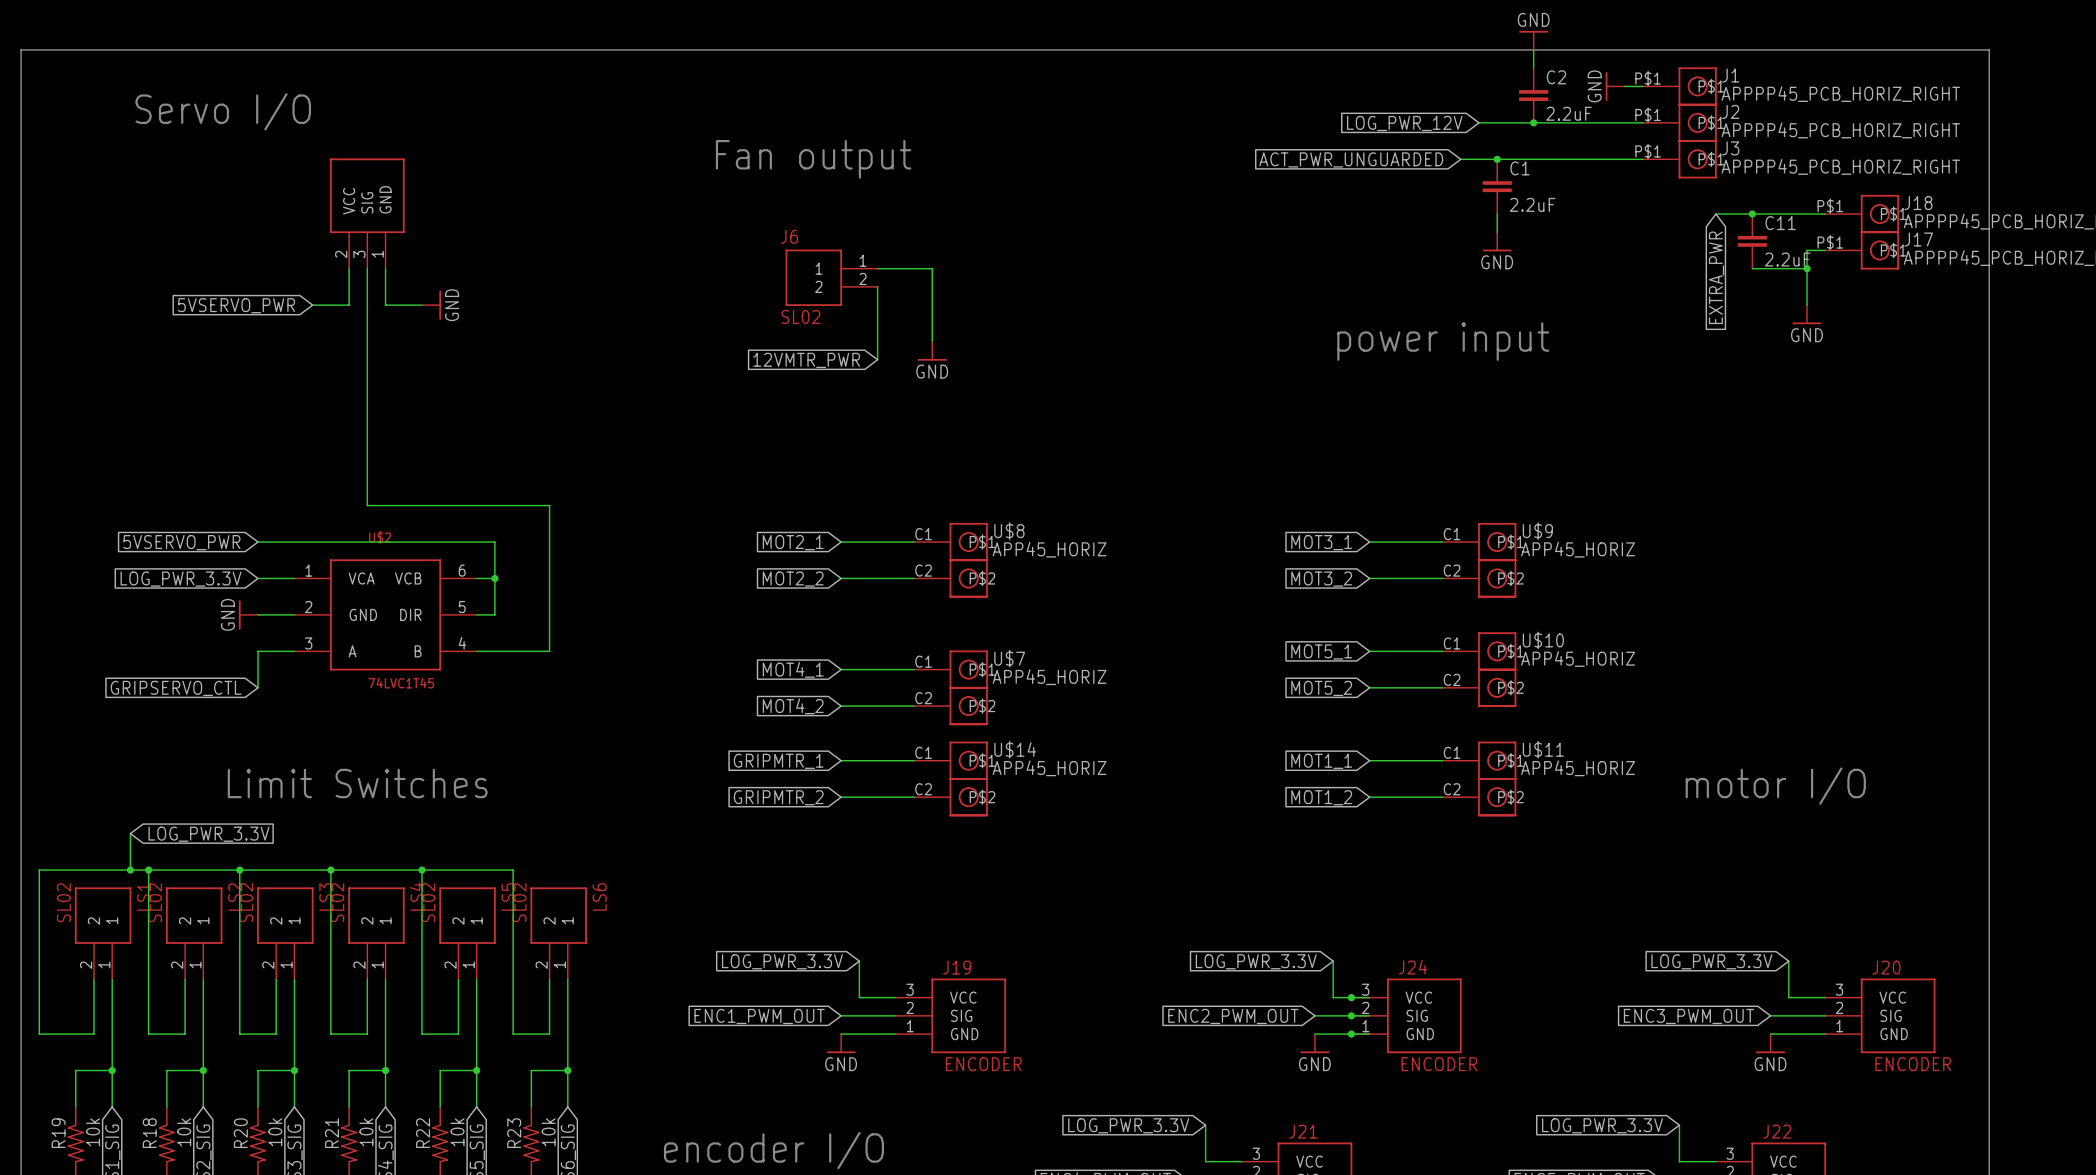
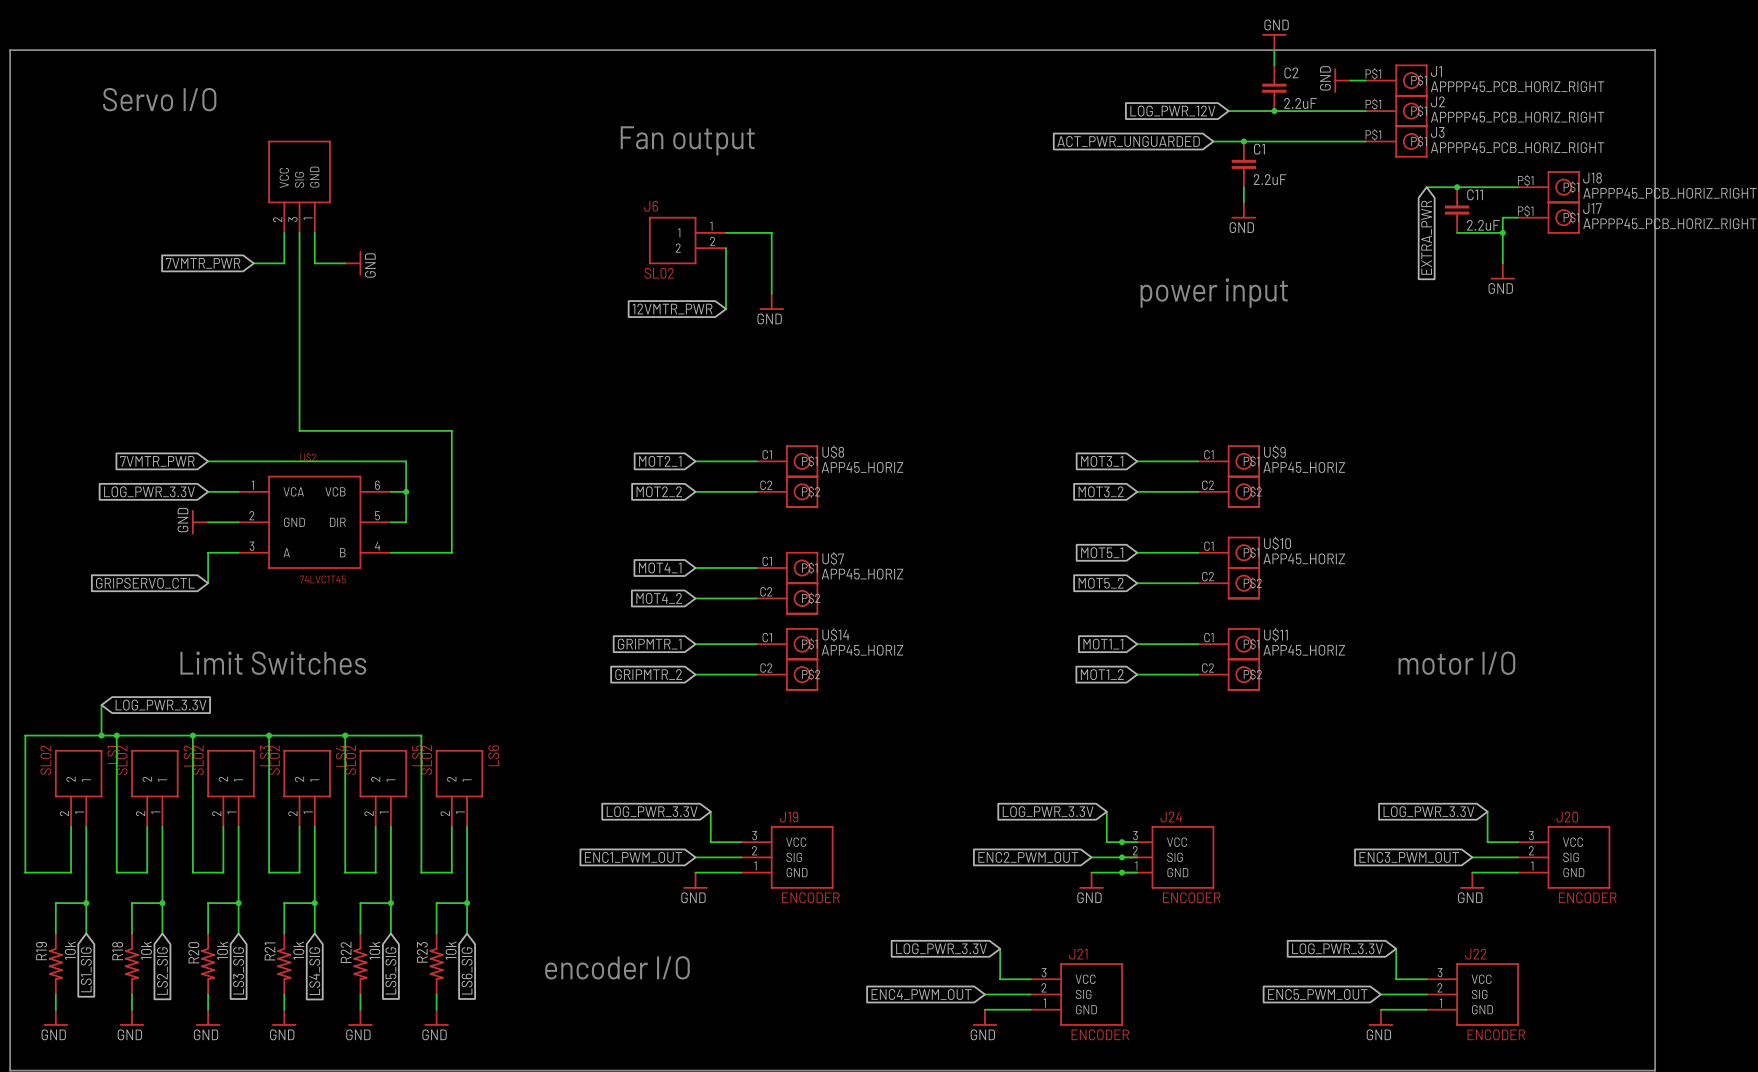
global label: 5VSERVO_PWR (236, 305) -> 7VMTR_PWR (203, 263)
global label: 5VSERVO_PWR (181, 542) -> 7VMTR_PWR (157, 461)

